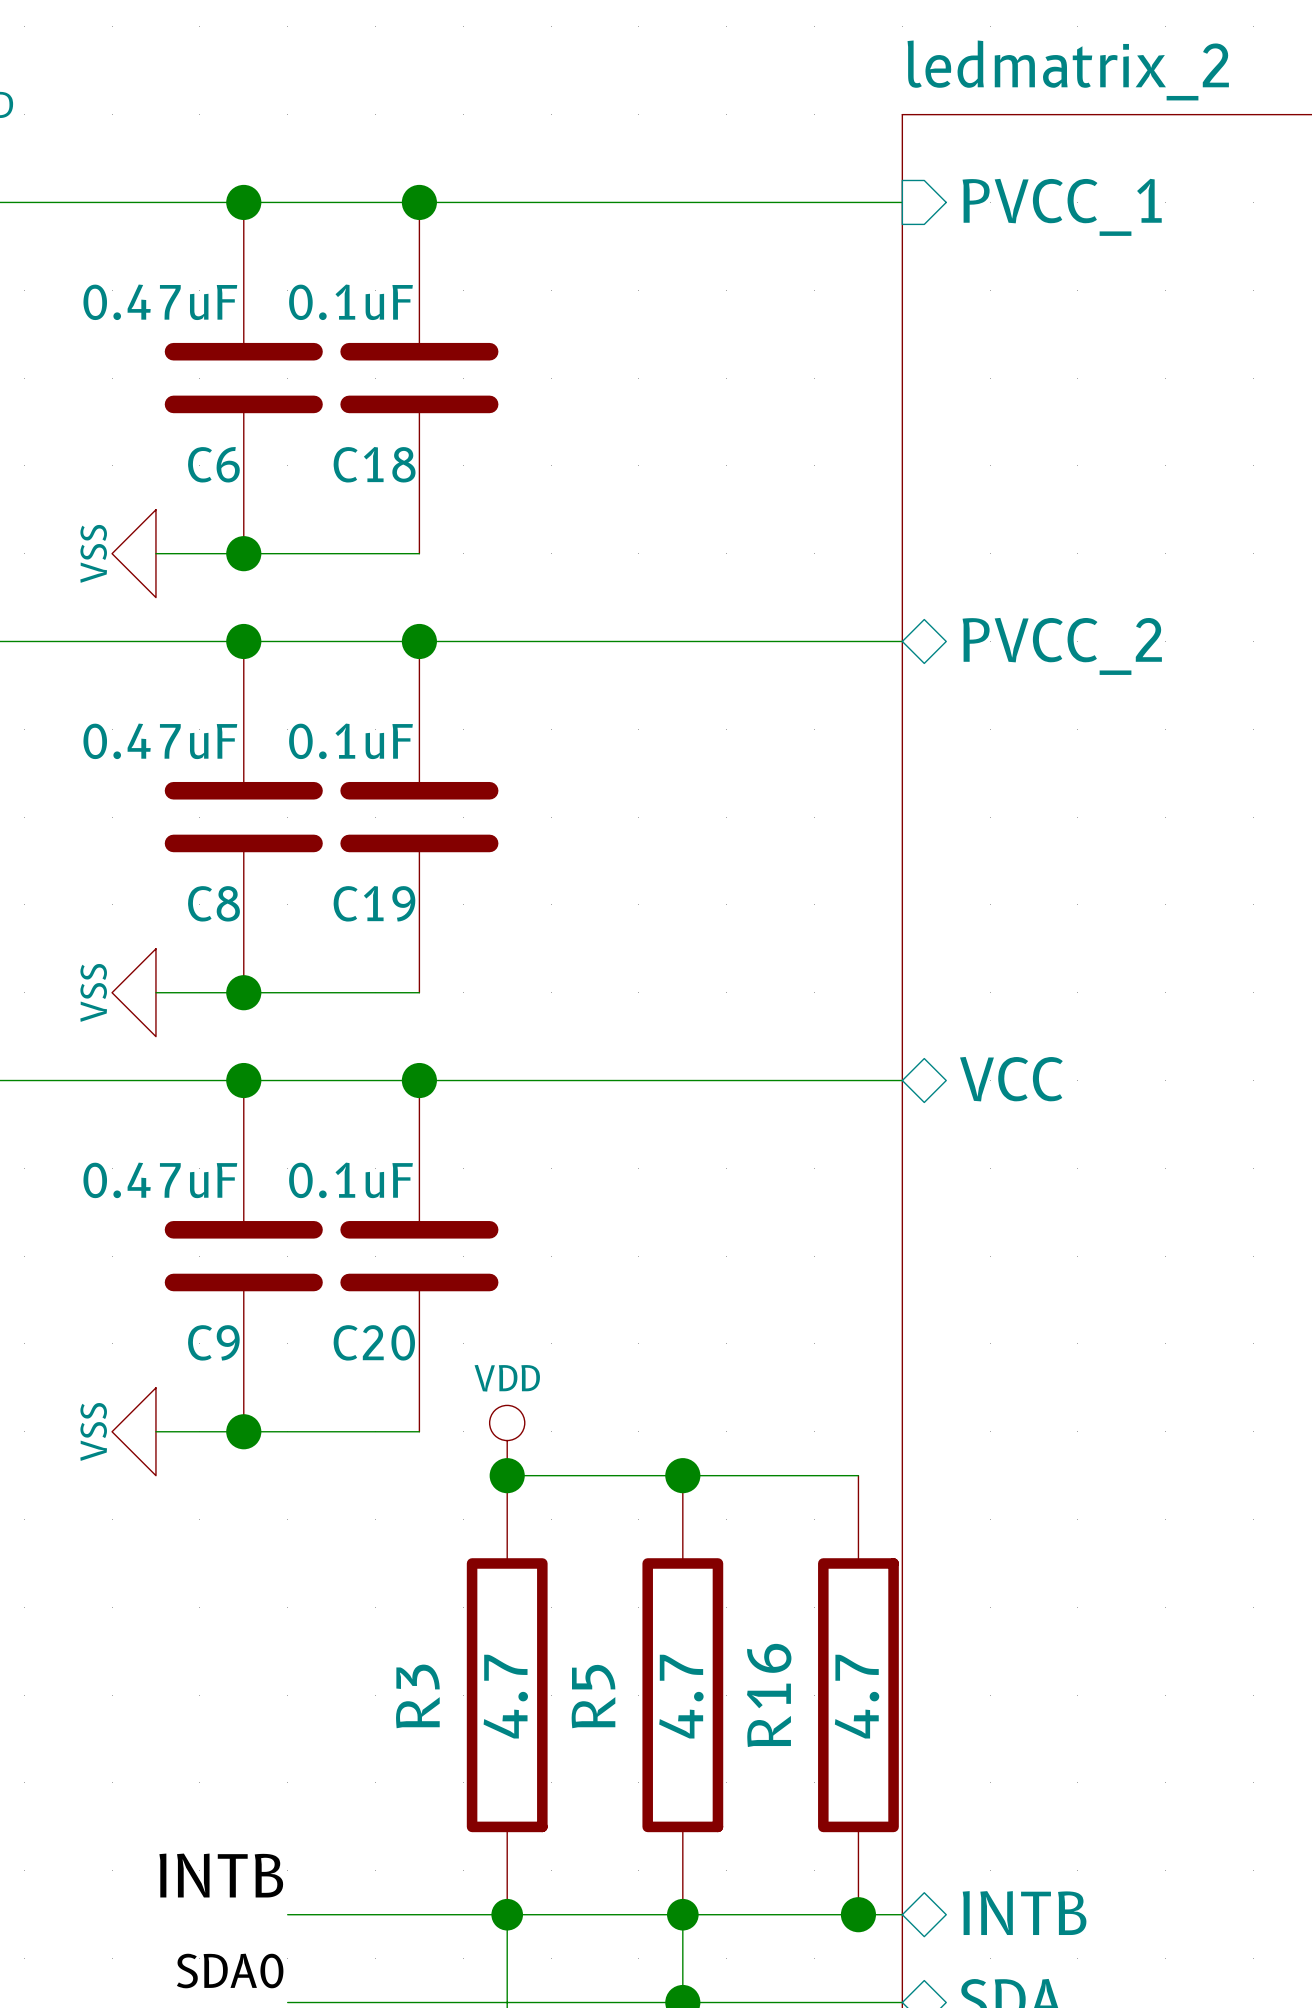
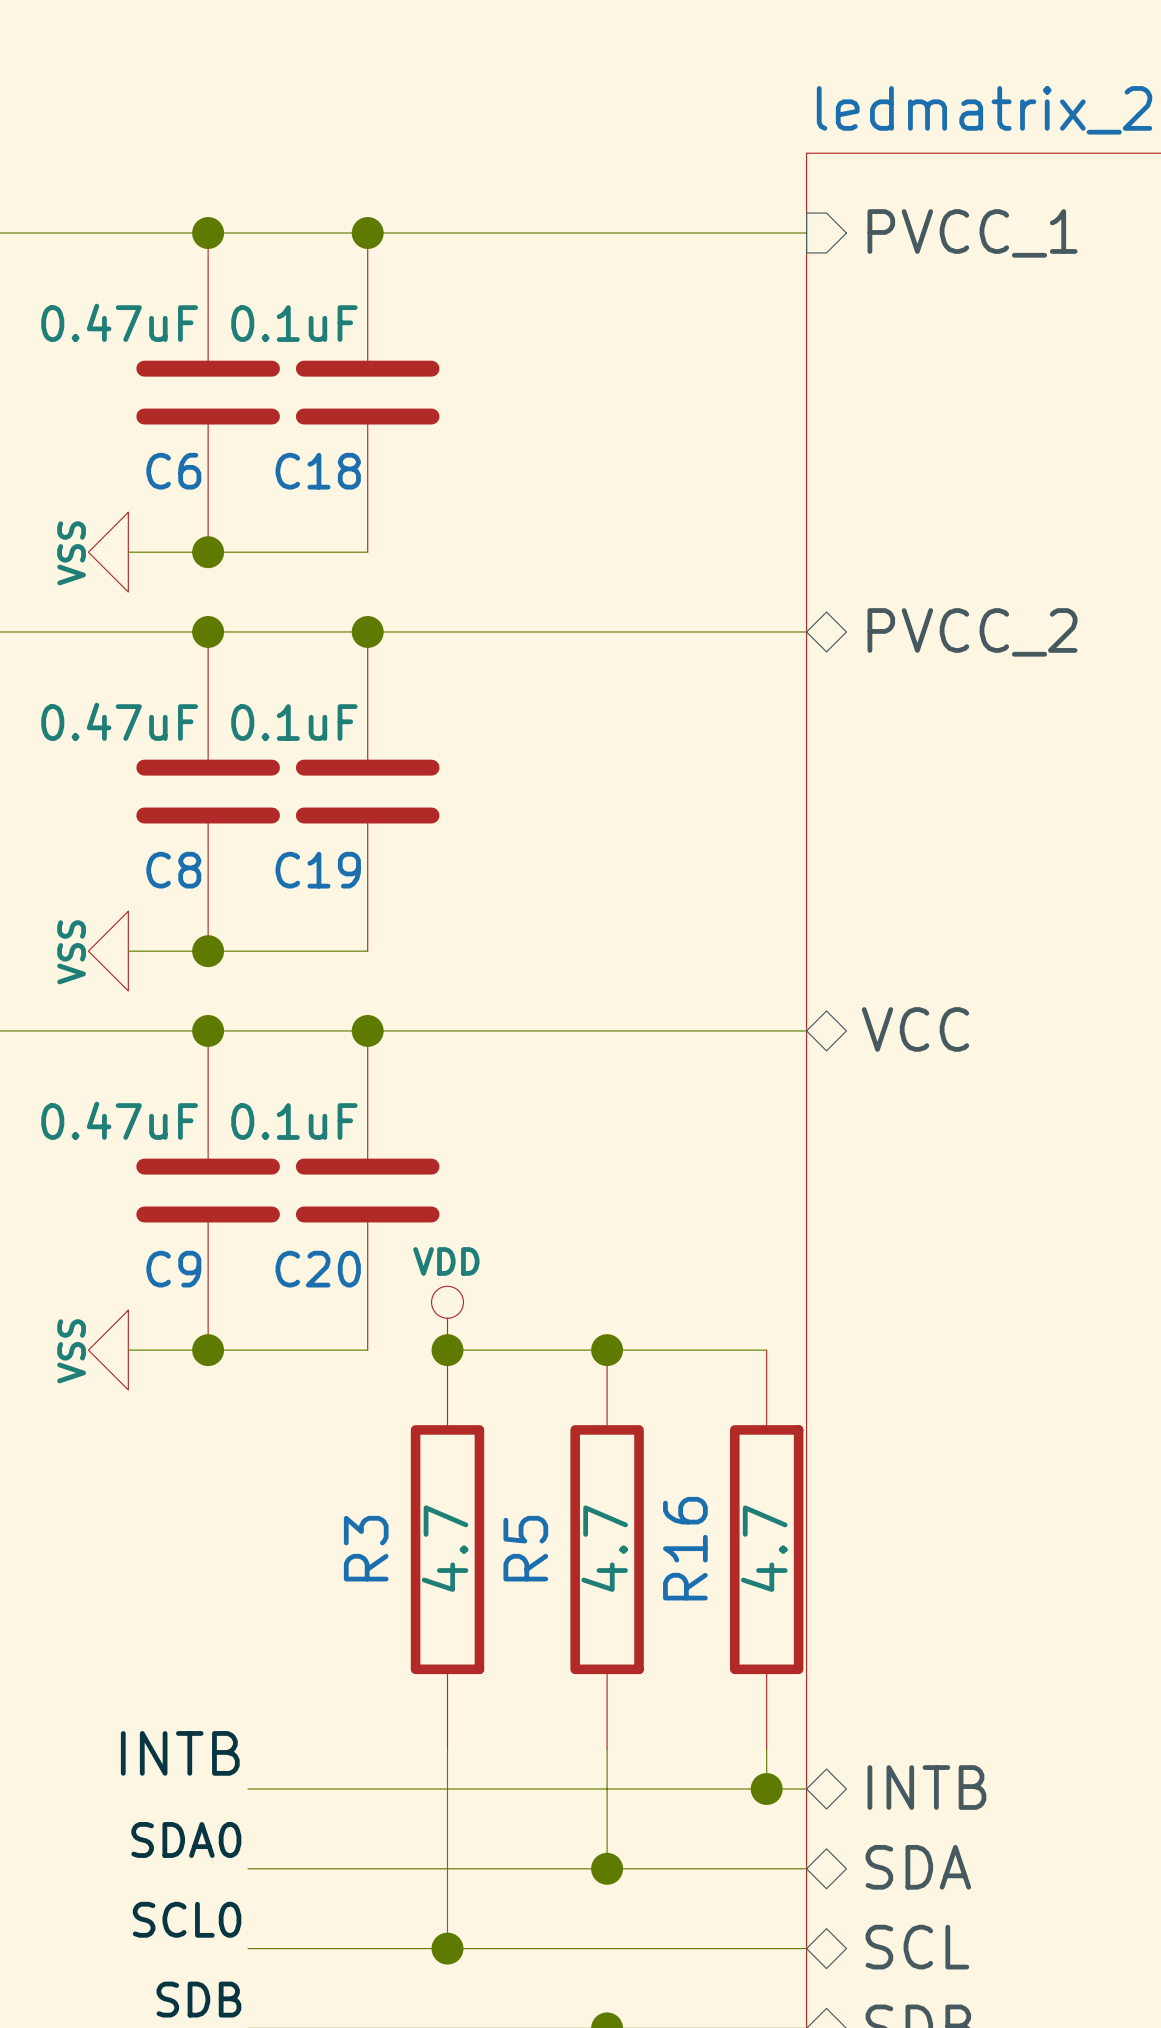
power symbol position: VDD (507, 1440) -> VDD (447, 1318)
wire: (507, 1475) (858, 1475) -> (447, 1350) (766, 1350)
junction position: (507, 1475) -> (447, 1350)
junction position: (682, 1475) -> (607, 1350)
R3 position: (507, 1695) -> (447, 1549)
R5 position: (682, 1695) -> (607, 1549)
R16 position: (858, 1695) -> (766, 1549)
junction: (507, 1914) -> none
junction: (682, 1914) -> none

